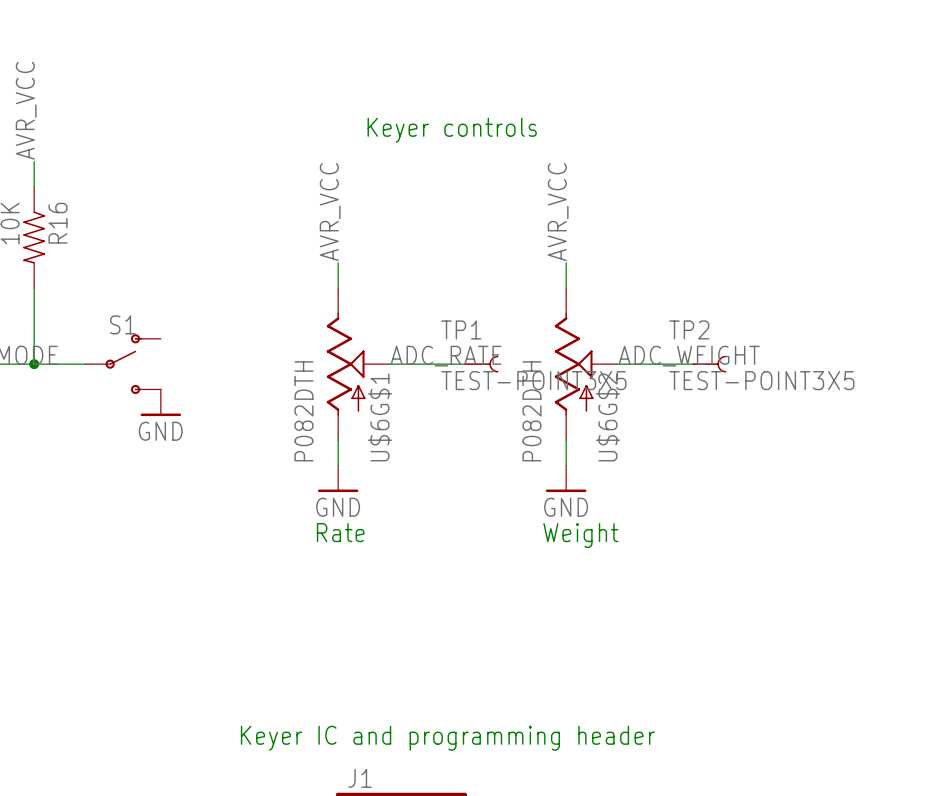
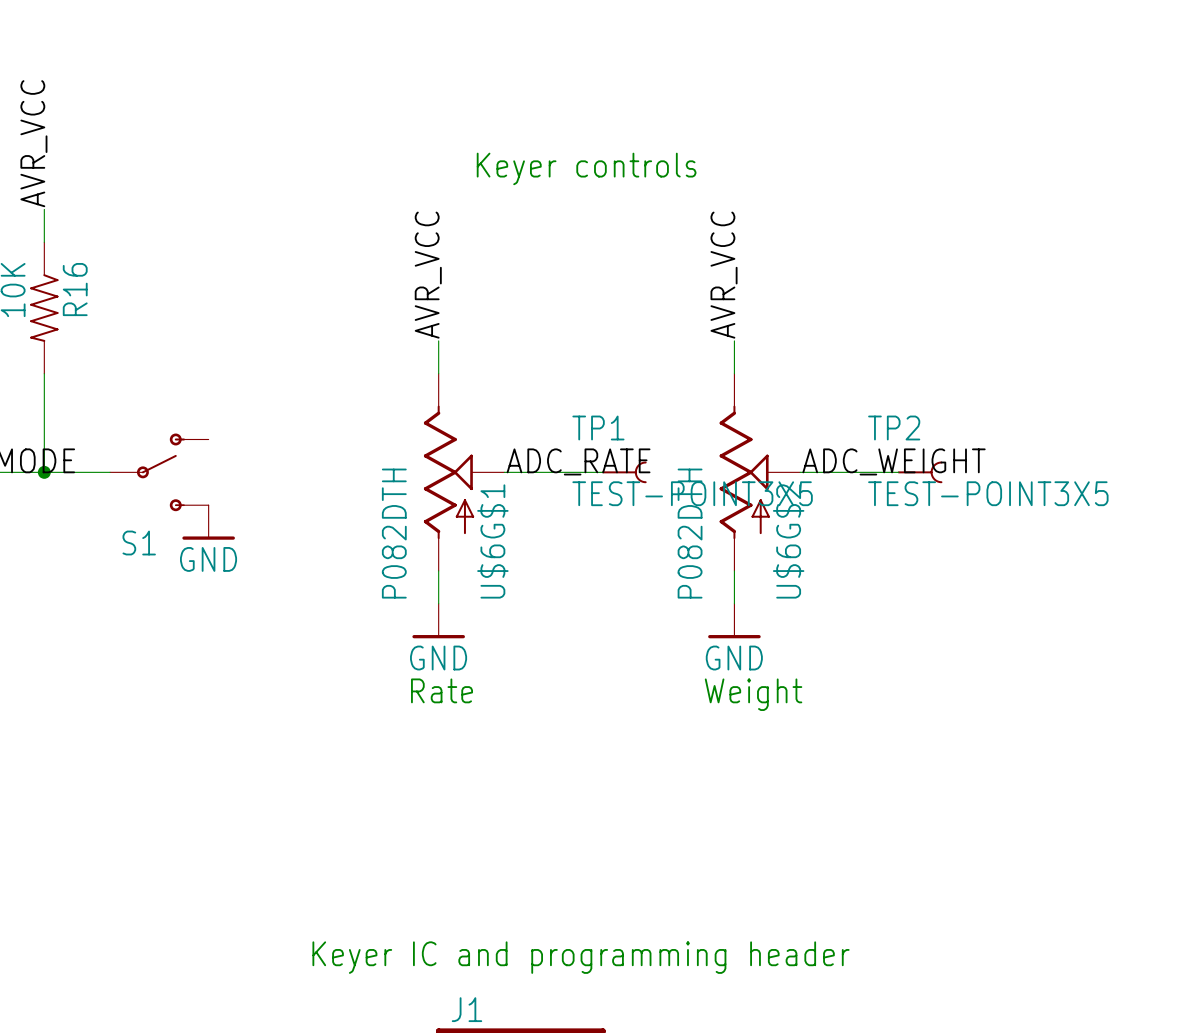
S1 name position: S1 (122, 324) -> S1 (139, 543)

